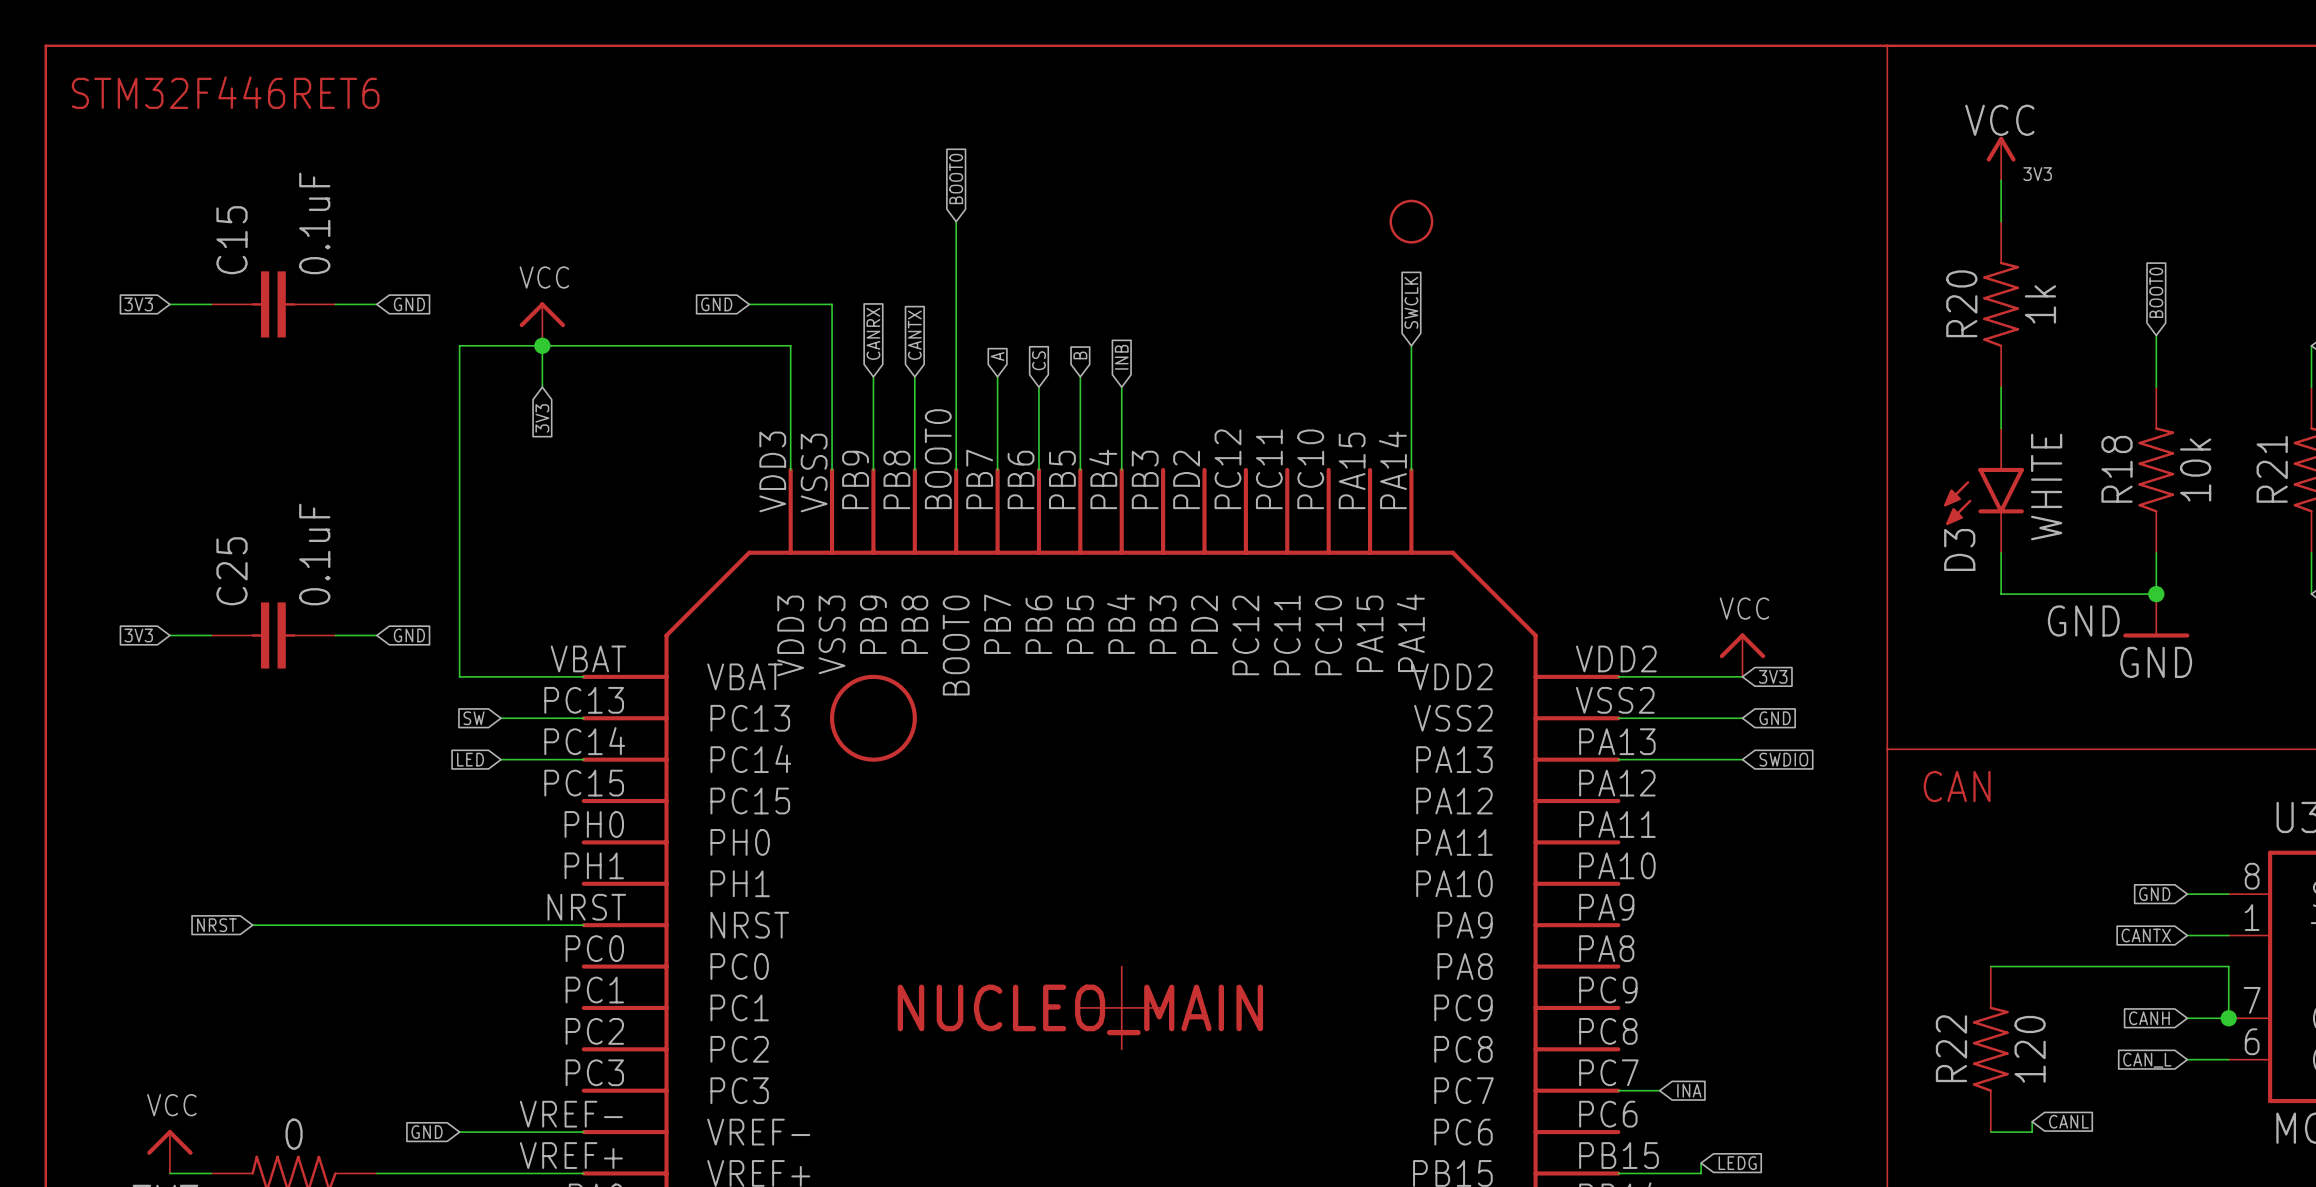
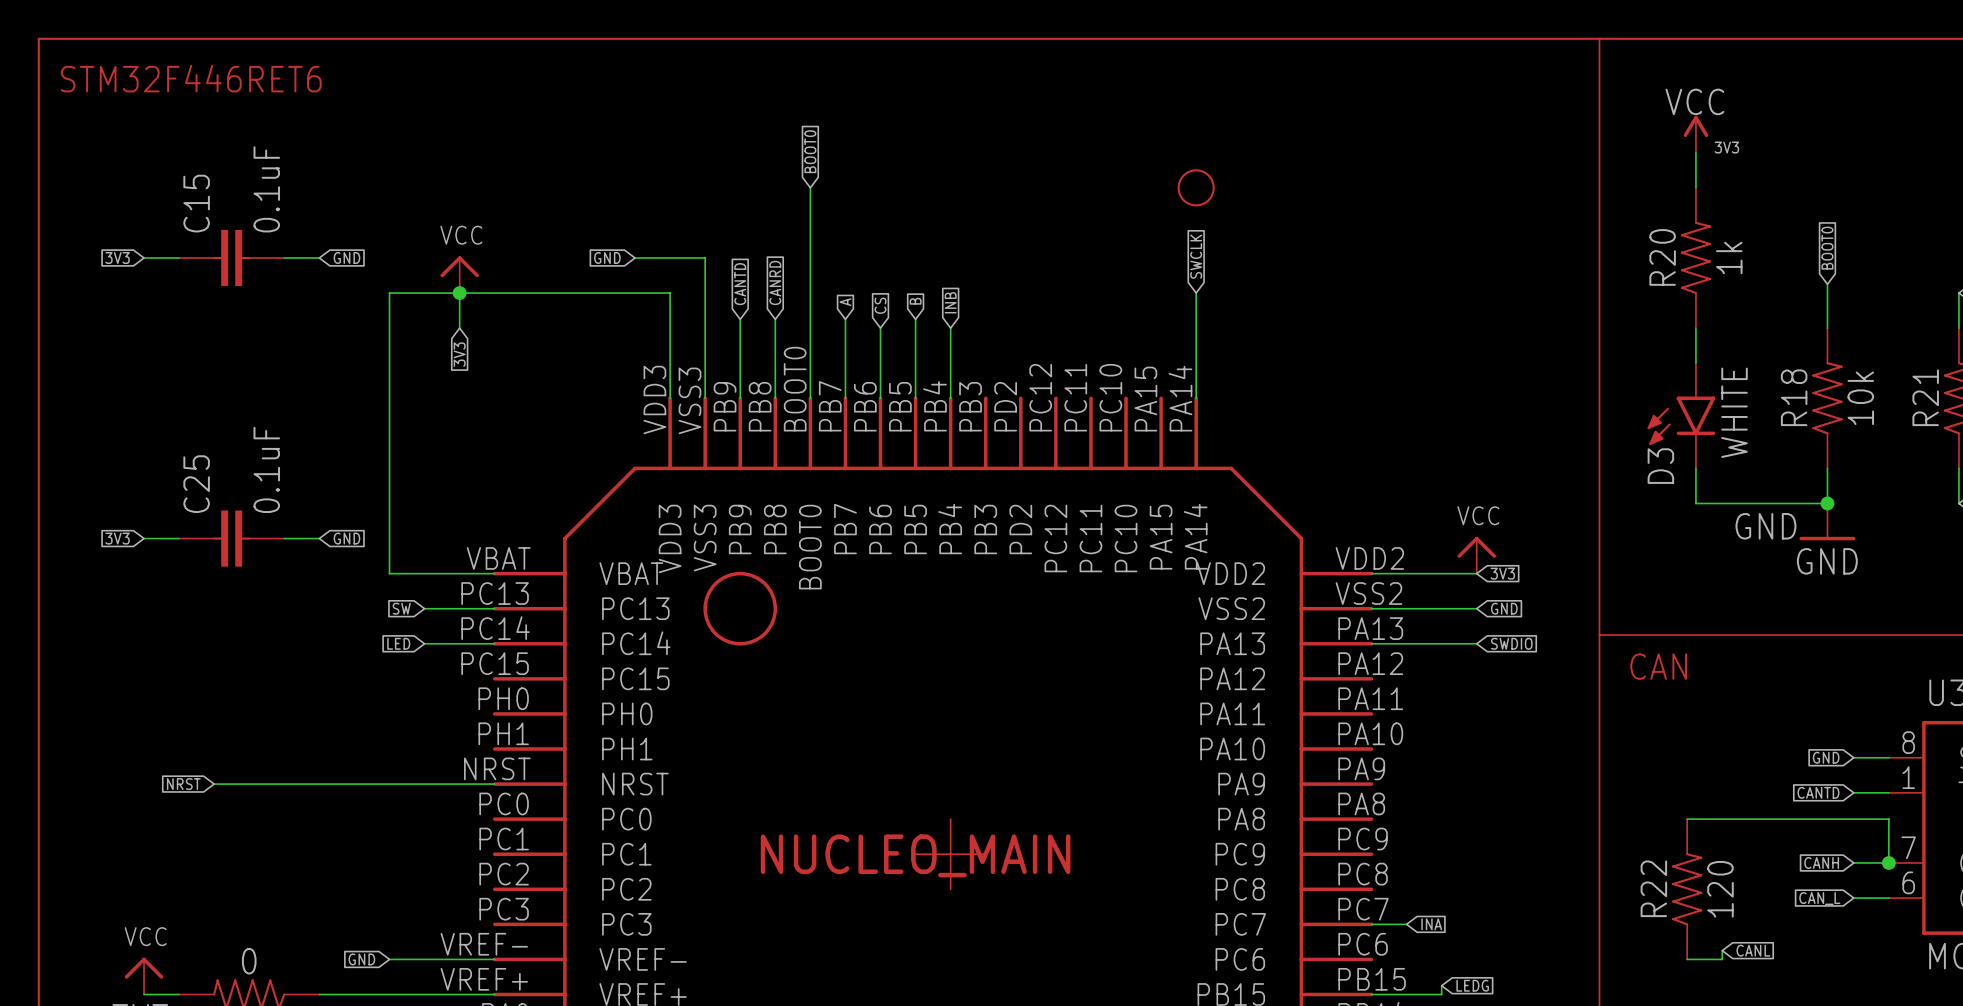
global label: CANRX (873, 333) -> CANTD (740, 284)
global label: CANTX (914, 335) -> CANRD (775, 282)
global label: CANTX (2146, 935) -> CANTD (1818, 792)

